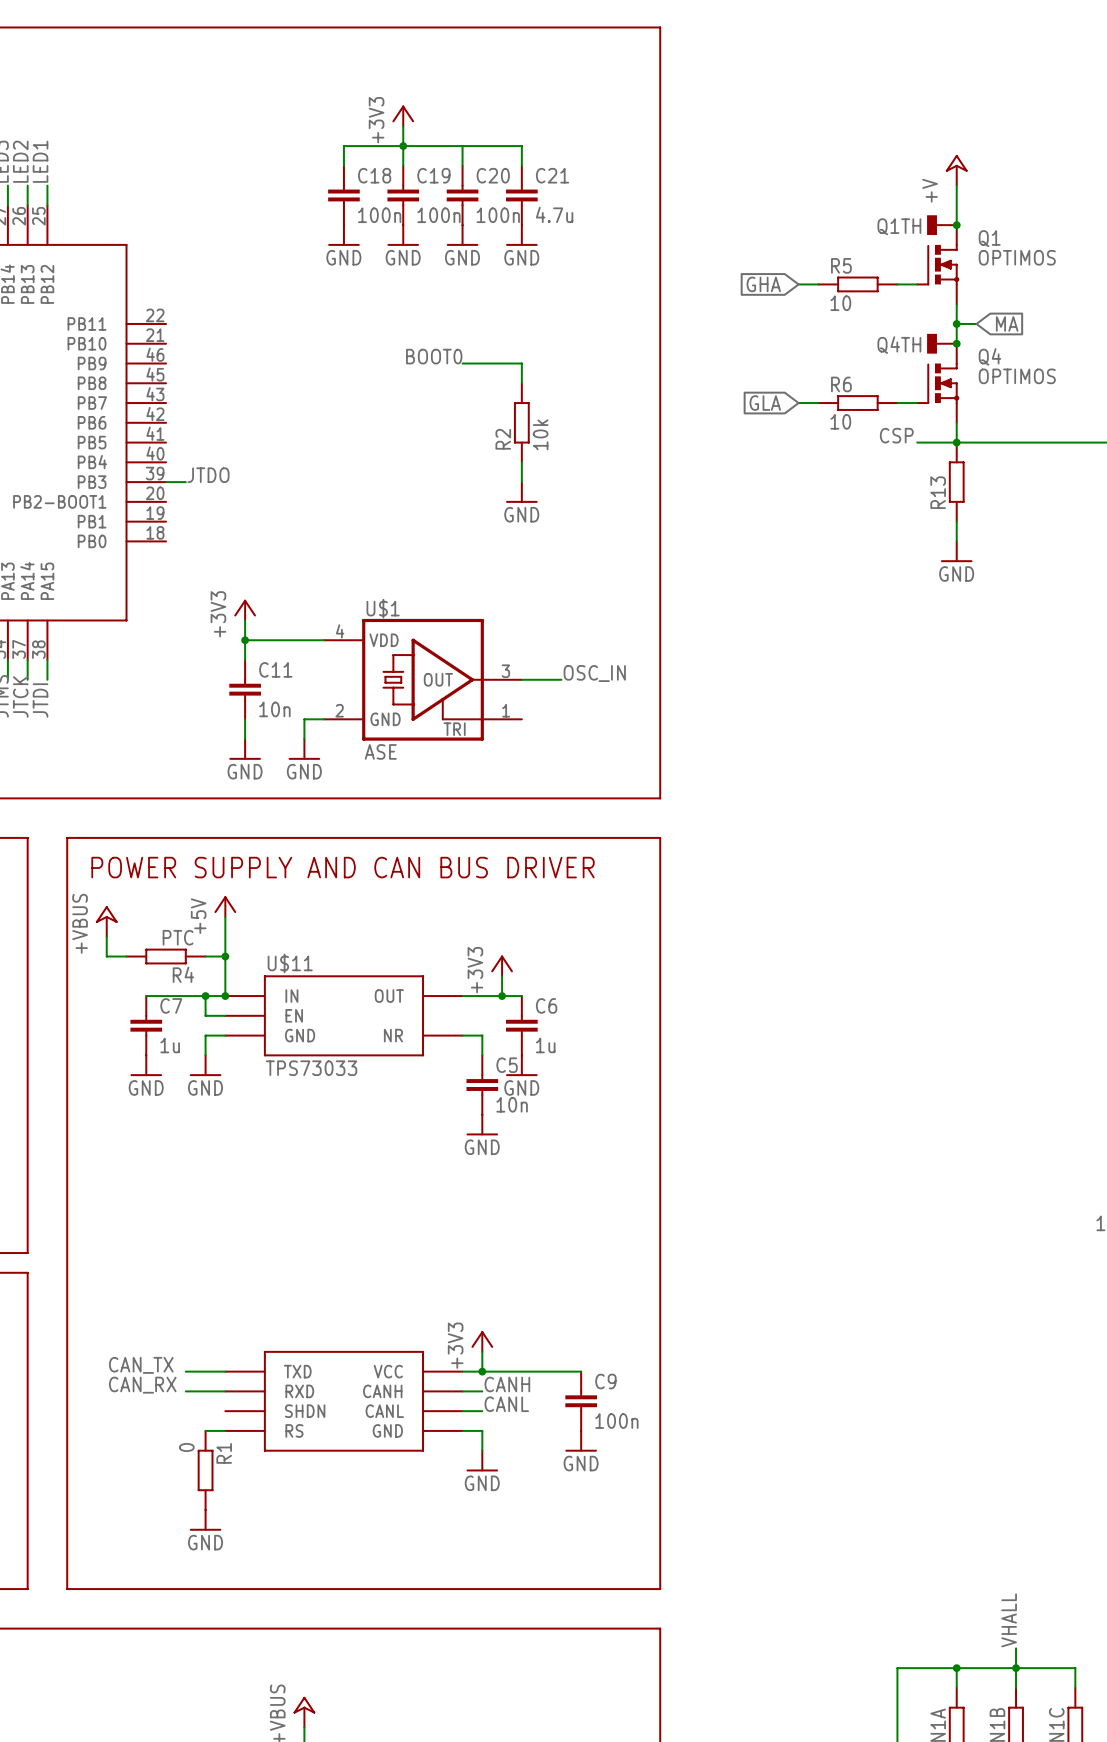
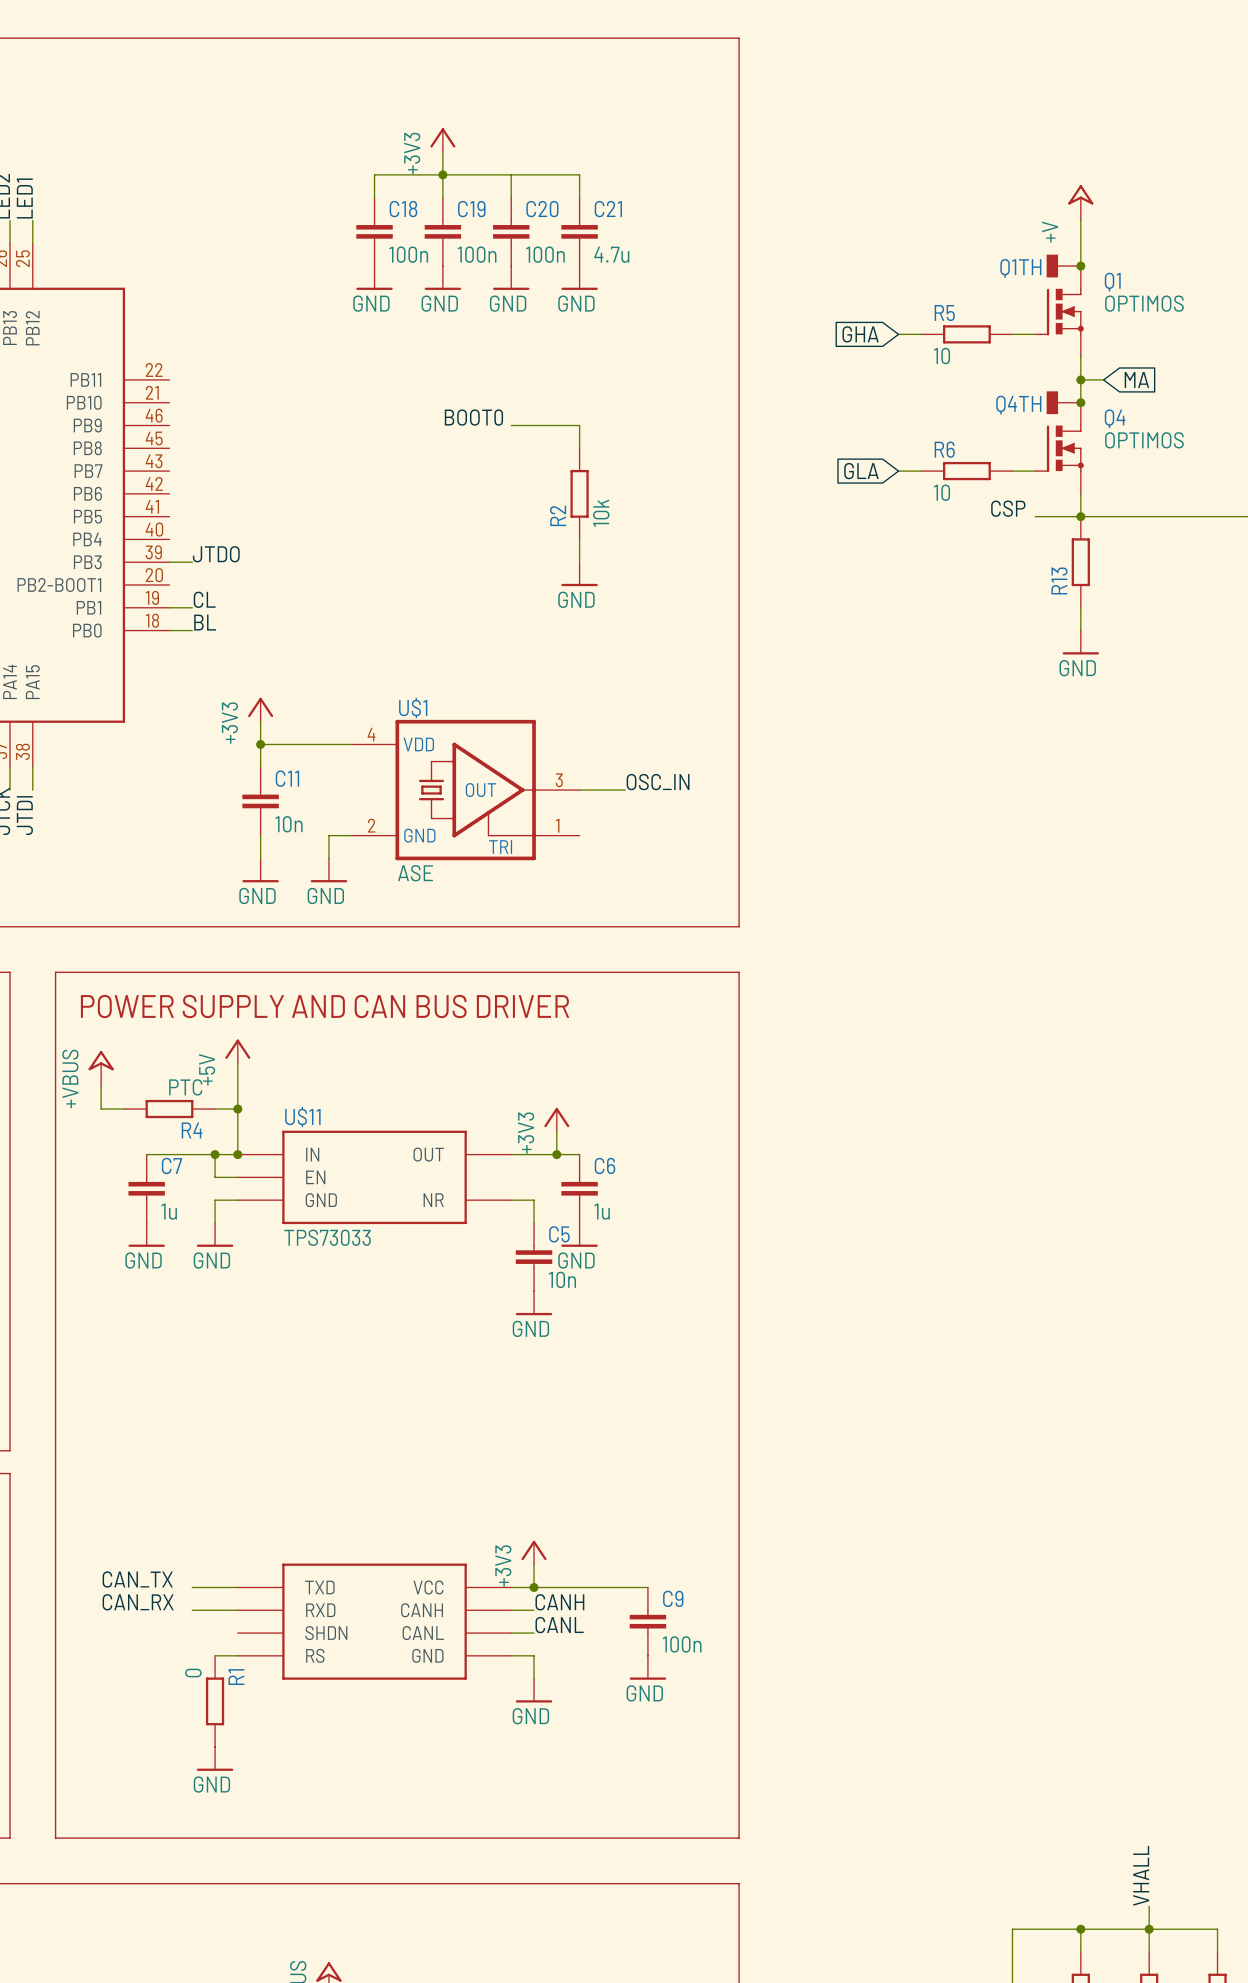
label: none -> CL (204, 599)
wire: none -> (169, 607) (192, 607)
label: none -> BL (205, 622)
wire: none -> (169, 630) (192, 630)

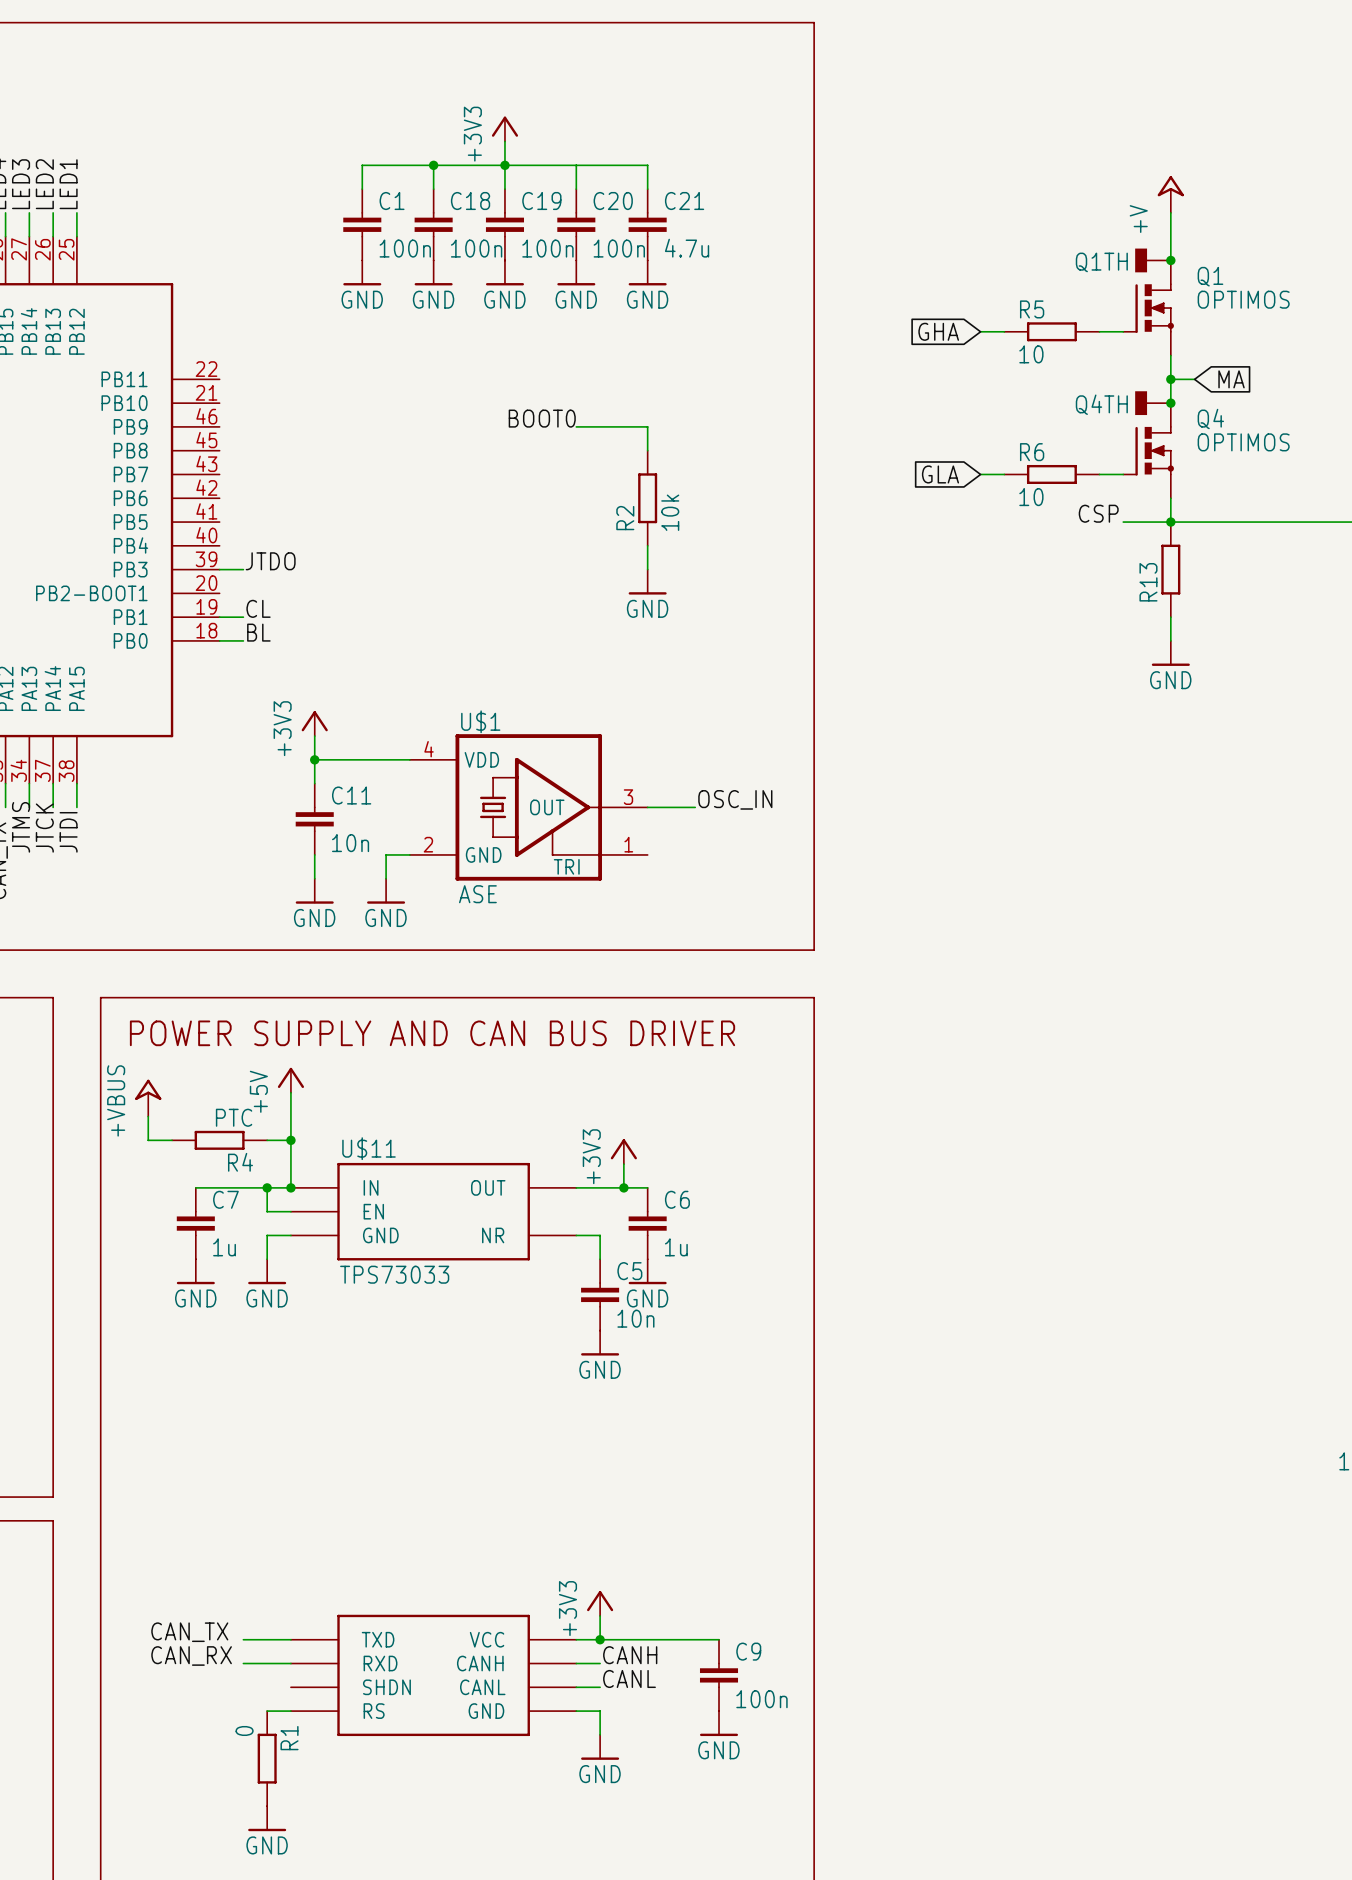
wire: none -> (433, 165) (362, 165) (362, 189)
junction: none -> (433, 165)
C1: none -> 100n (362, 224)
power symbol: none -> GND (362, 272)

